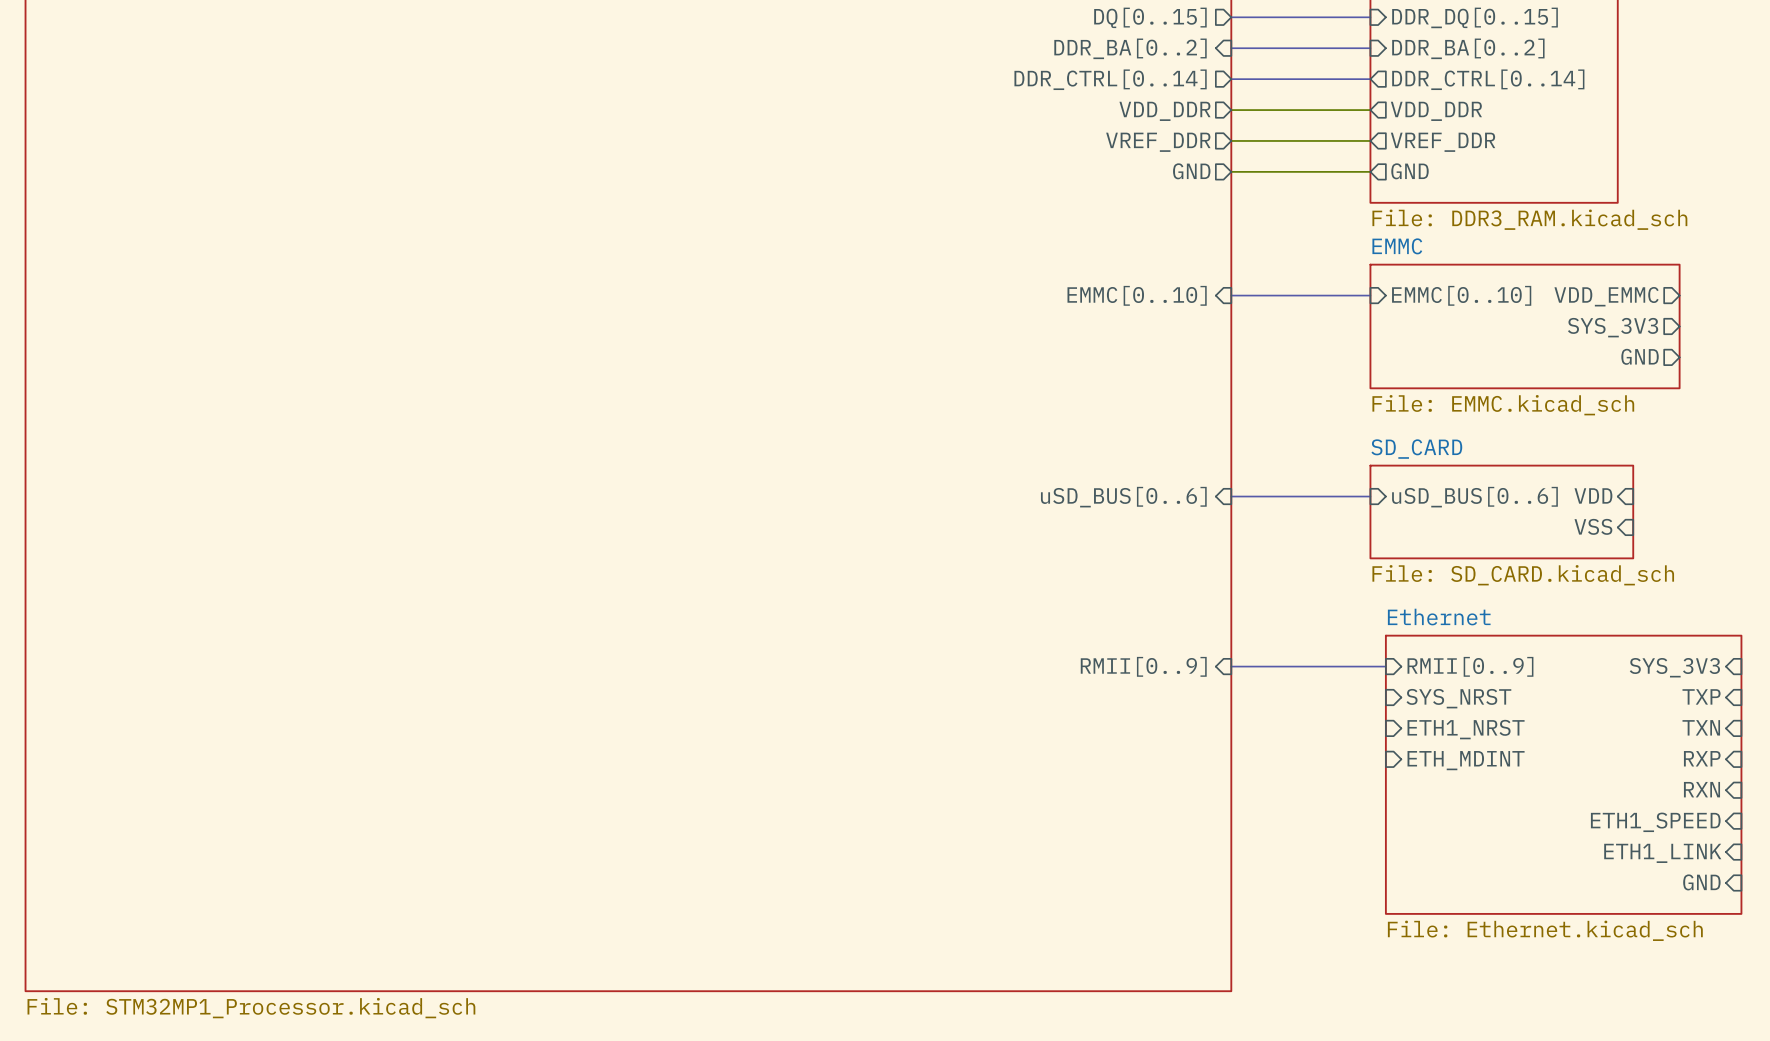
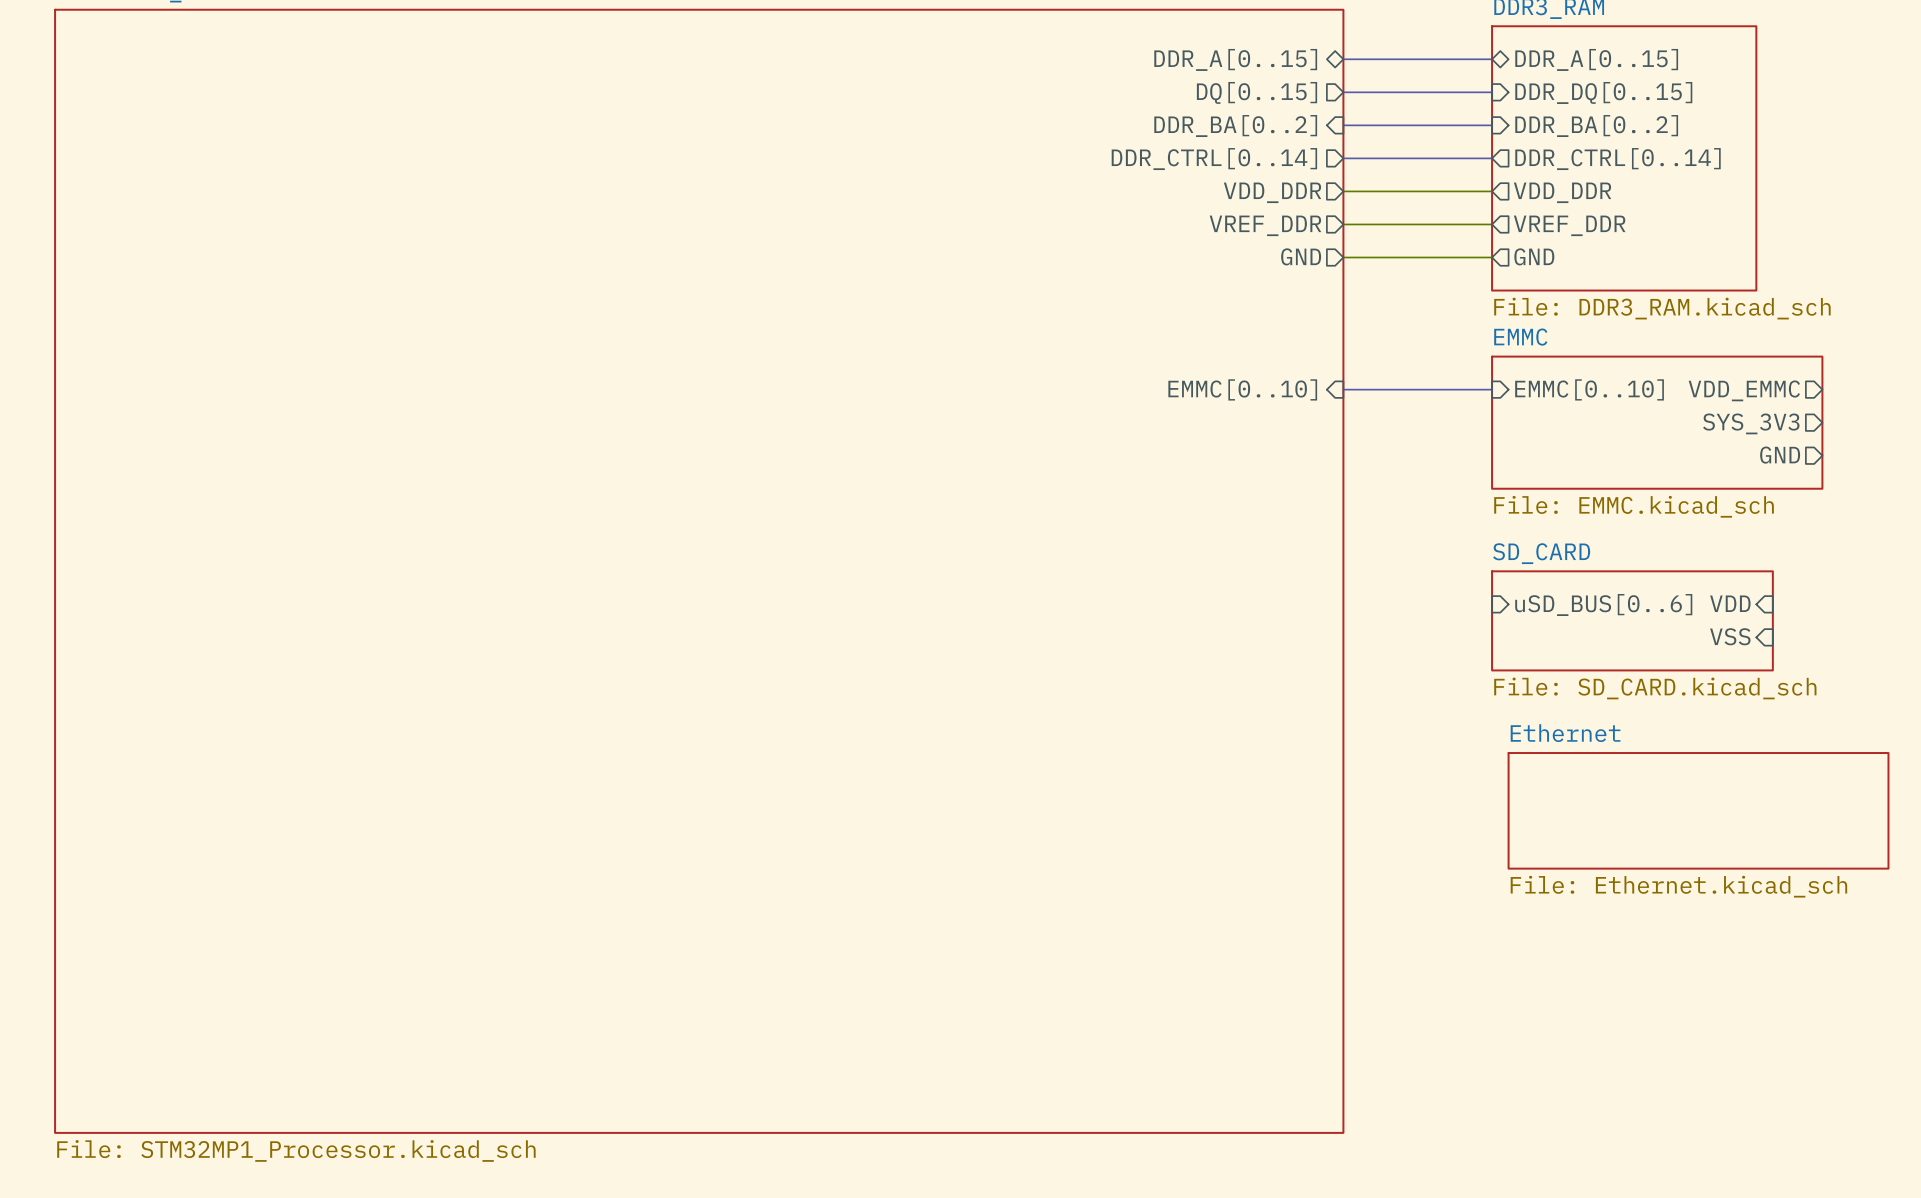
bus: (1231, 496) (1370, 496) -> none
sheet pin: uSD_BUS[0..6] (1123, 497) -> none
sheet pin: RMII[0..9] (1143, 666) -> none
bus: (1231, 666) (1385, 666) -> none
sheet pin: RMII[0..9] (1470, 666) -> none
sheet pin: SYS_3V3 (1674, 667) -> none
sheet Ethernet: none -> File: Ethernet.kicad_sch (1698, 810)
sheet pin: TXP (1701, 696) -> none
sheet pin: SYS_NRST (1458, 698) -> none
sheet pin: TXN (1701, 727) -> none
sheet pin: ETH1_NRST (1466, 729) -> none
sheet pin: RXP (1702, 758) -> none
sheet pin: ETH_MDINT (1466, 760) -> none
sheet Ethernet: File: Ethernet.kicad_sch (1563, 774) -> none
sheet pin: RXN (1701, 789) -> none
sheet pin: ETH1_SPEED (1655, 822) -> none
sheet pin: ETH1_LINK (1662, 853) -> none
sheet pin: GND (1701, 882) -> none

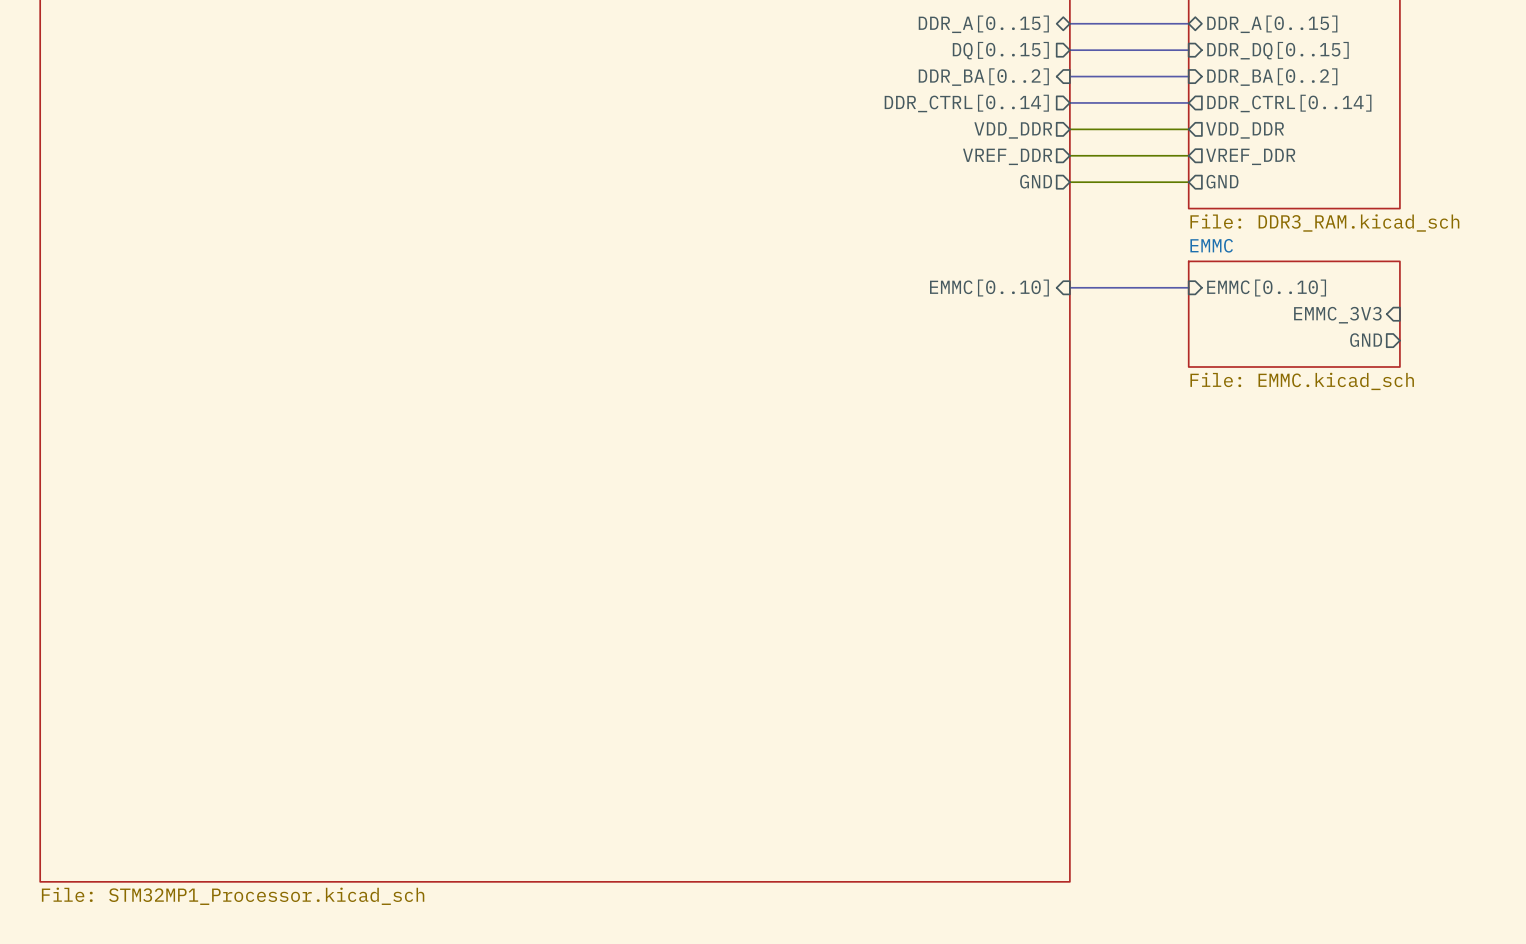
sheet pin: VDD_EMMC (1744, 390) -> none
sheet EMMC: none -> File: EMMC.kicad_sch (1294, 314)
sheet EMMC: File: EMMC.kicad_sch (1657, 422) -> none
sheet pin: none -> EMMC_3V3 (1337, 315)
sheet pin: SYS_3V3 (1751, 423) -> none
sheet pin position: GND (1780, 455) -> GND (1366, 340)
sheet pin: VDD (1730, 603) -> none
sheet pin: uSD_BUS[0..6] (1603, 605) -> none
sheet SD_CARD: File: SD_CARD.kicad_sch (1632, 620) -> none
sheet pin: VSS (1730, 636) -> none
sheet Ethernet: File: Ethernet.kicad_sch (1698, 810) -> none

